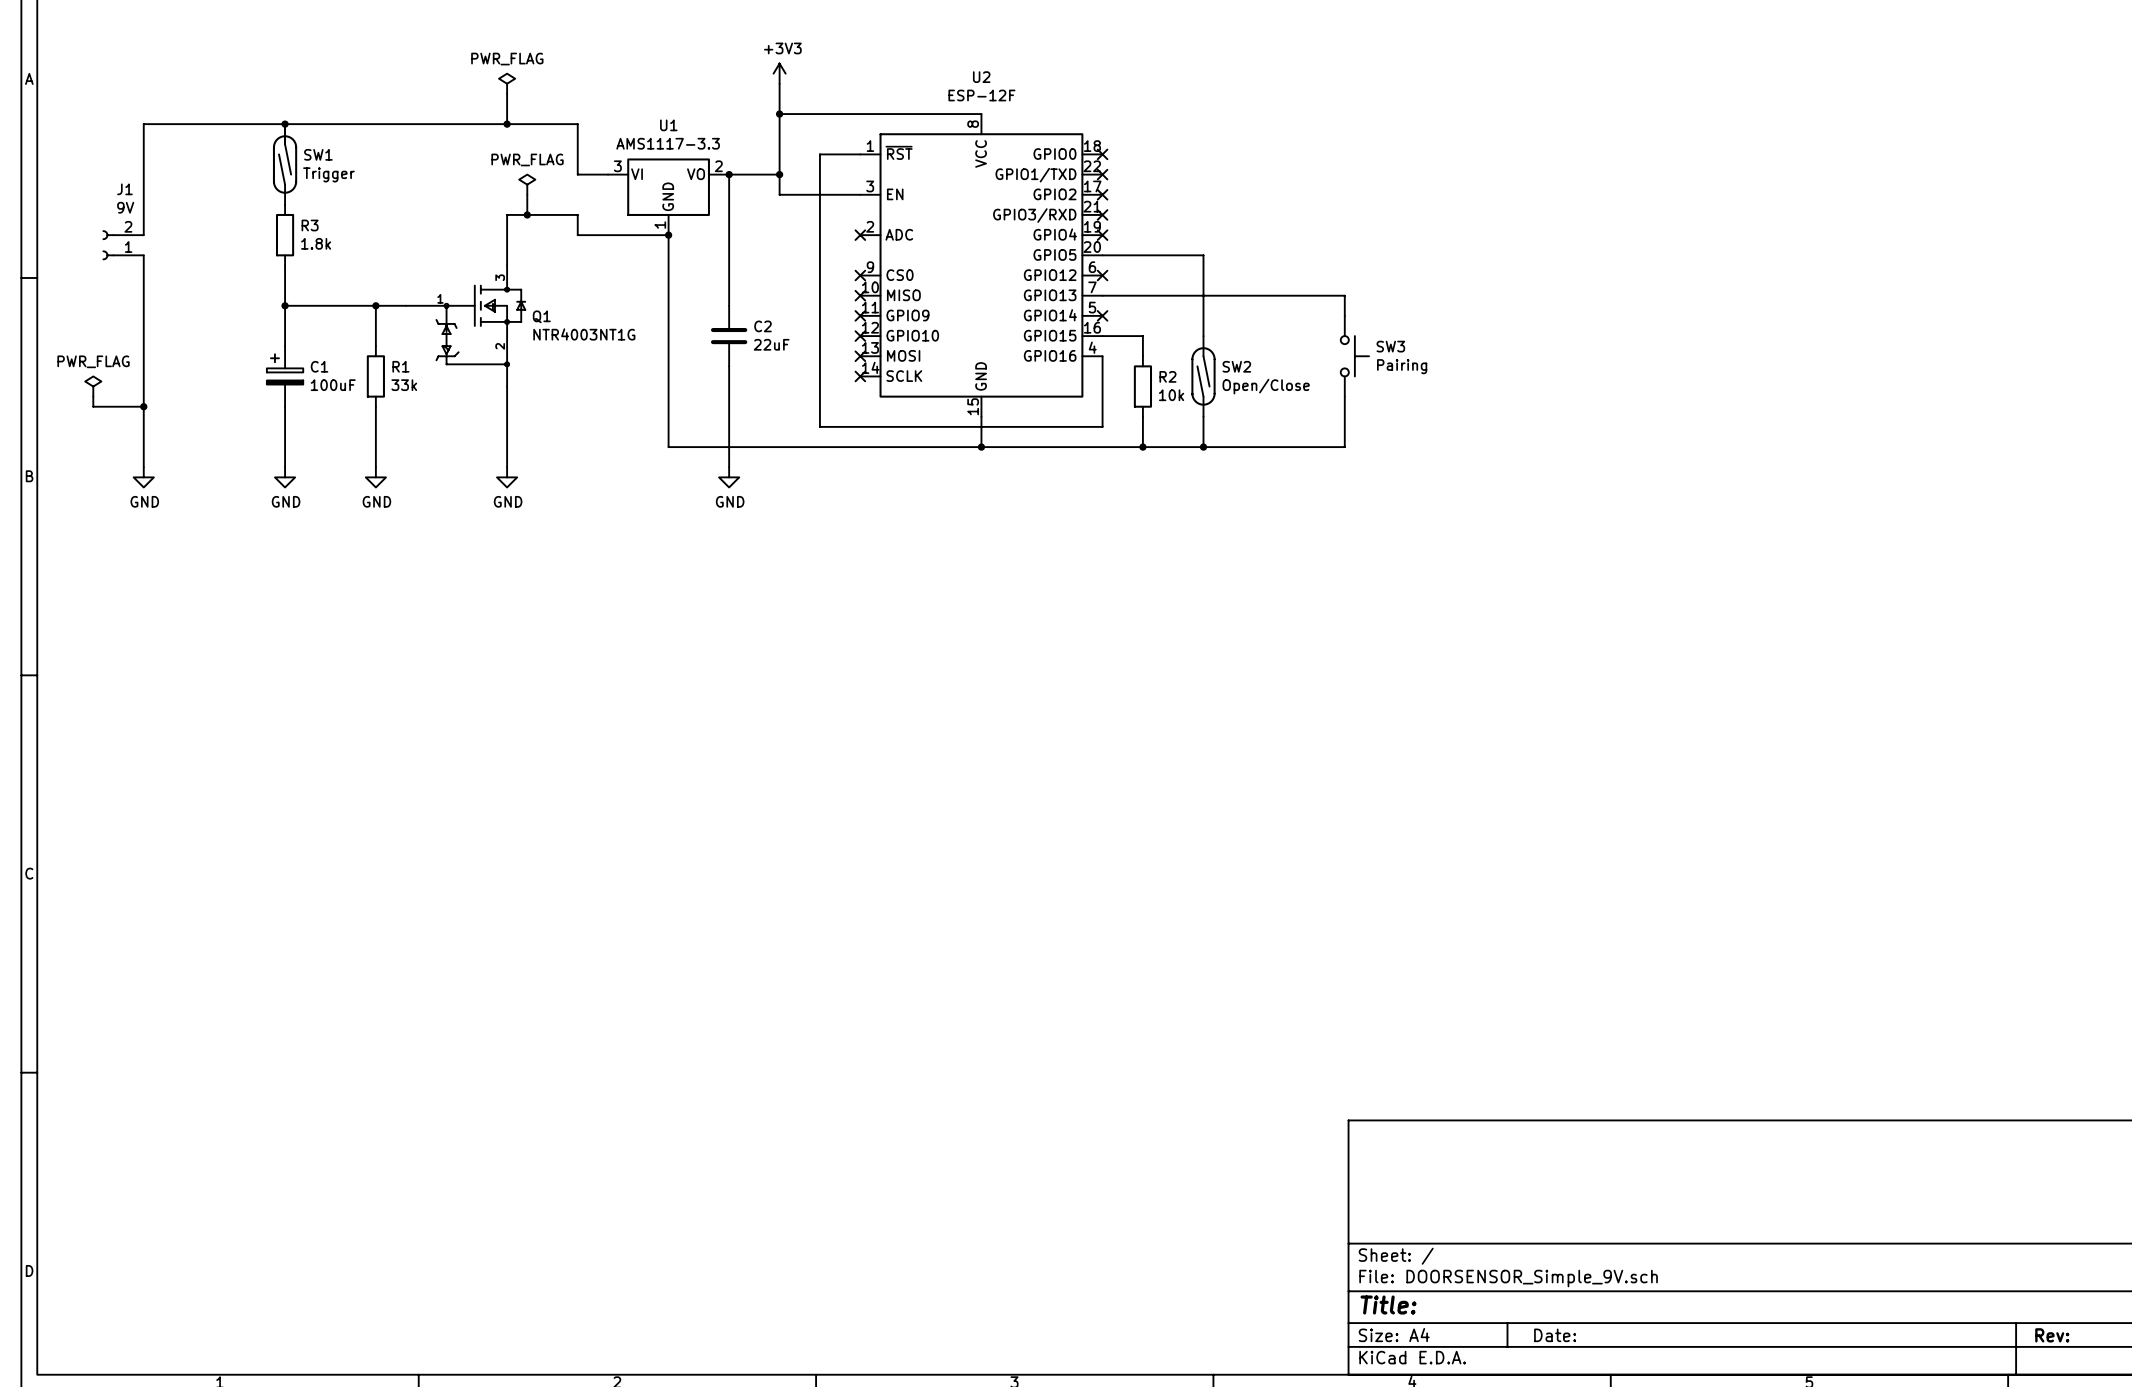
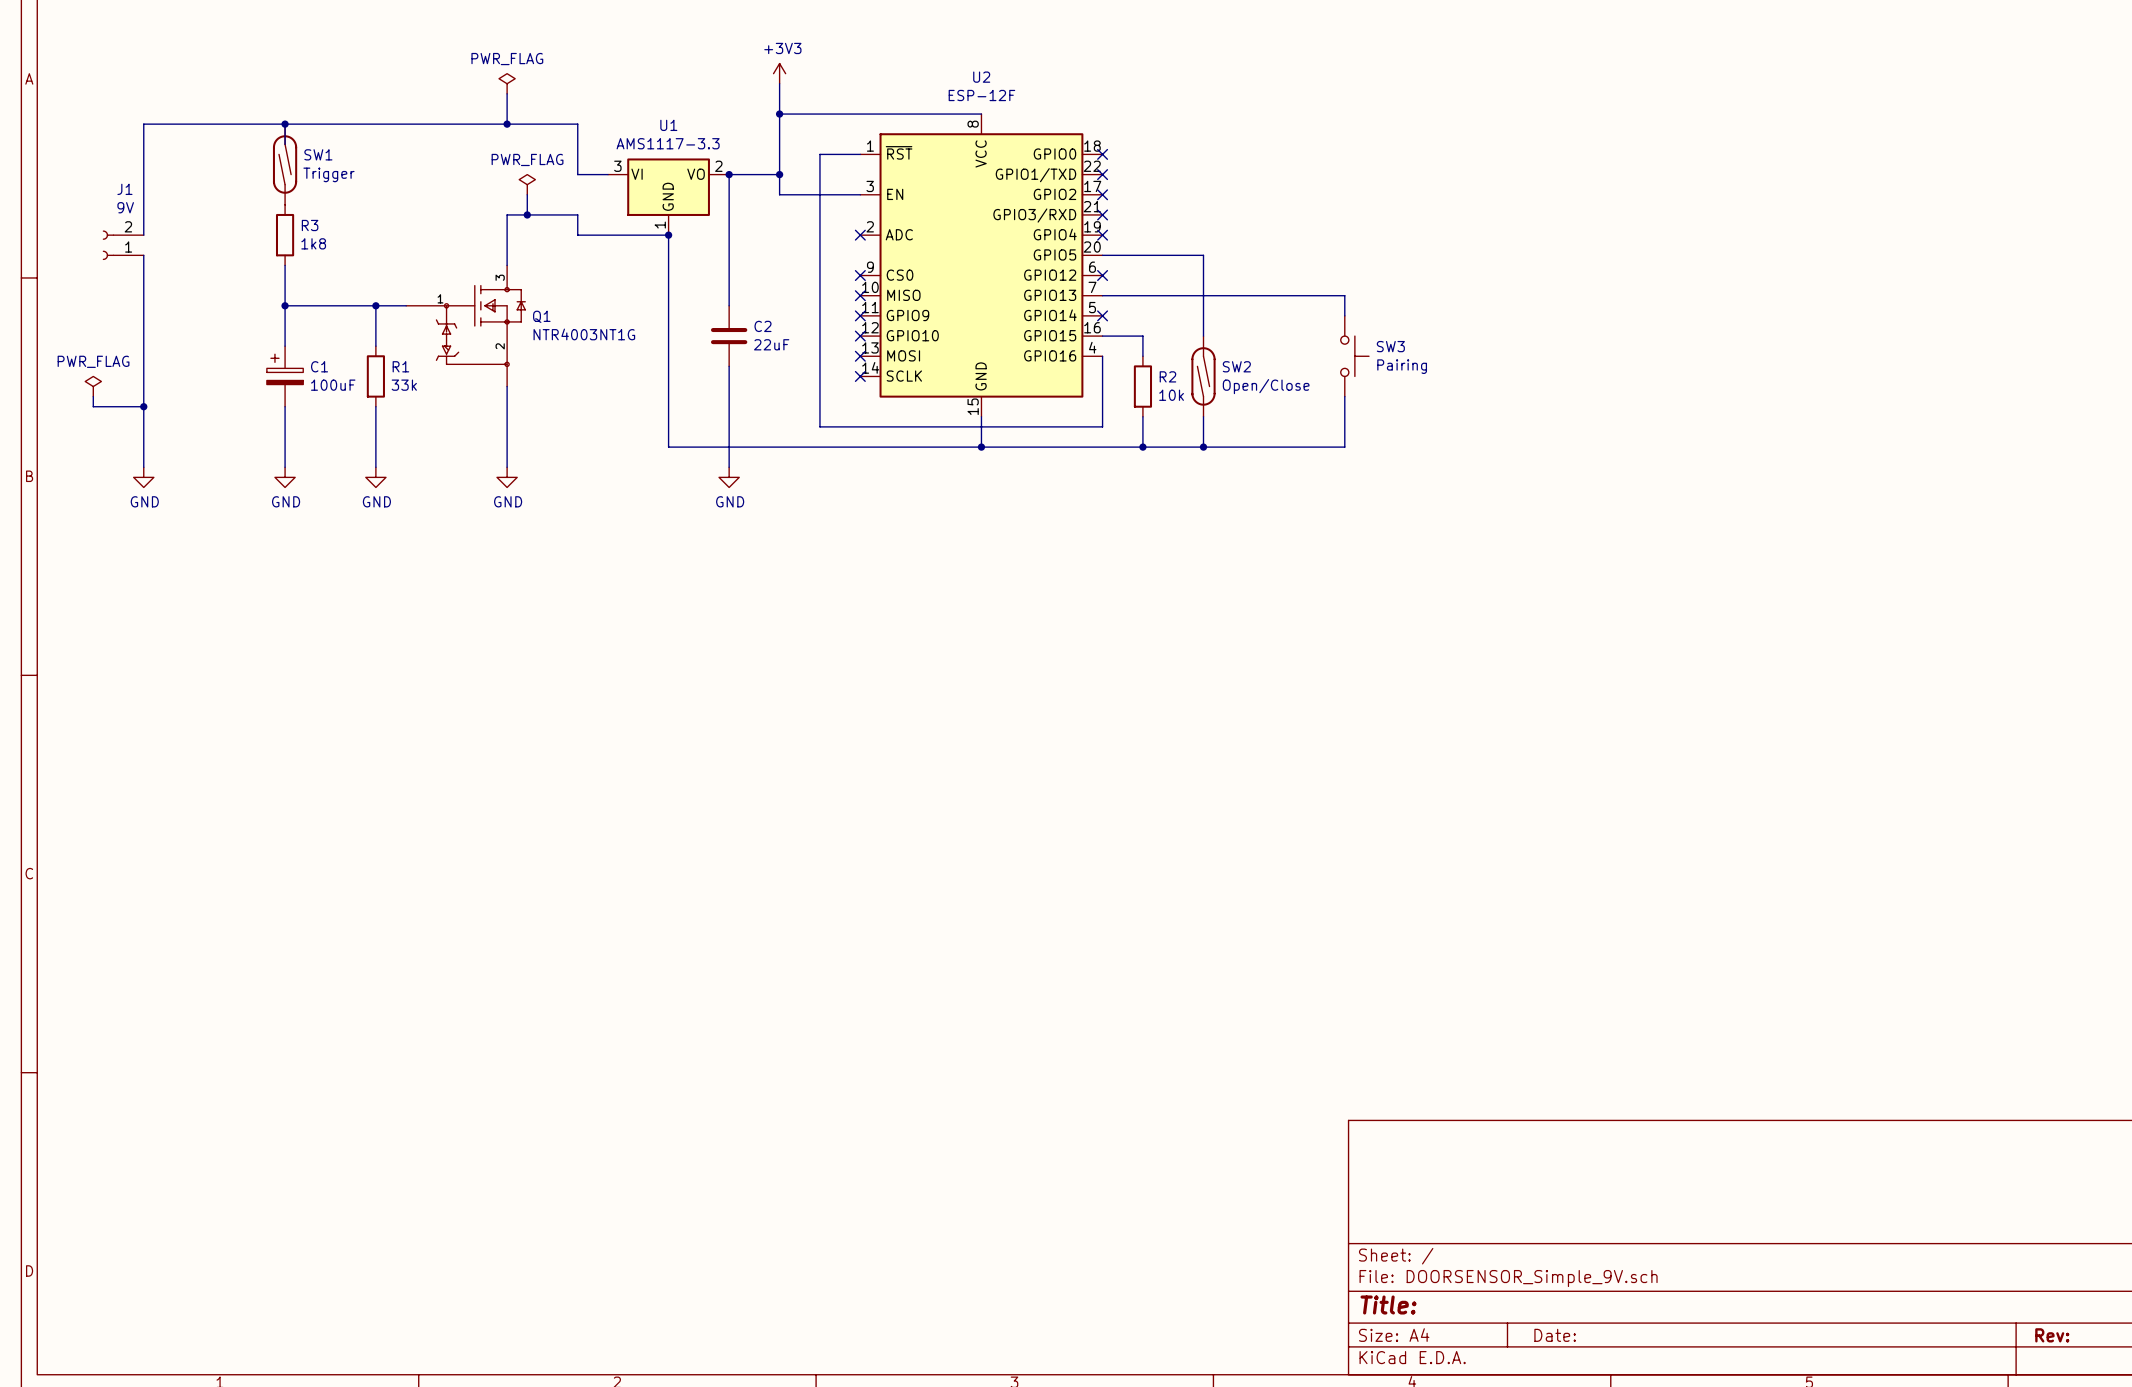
R3 value: 1.8k (316, 243) -> 1k8 (313, 243)

